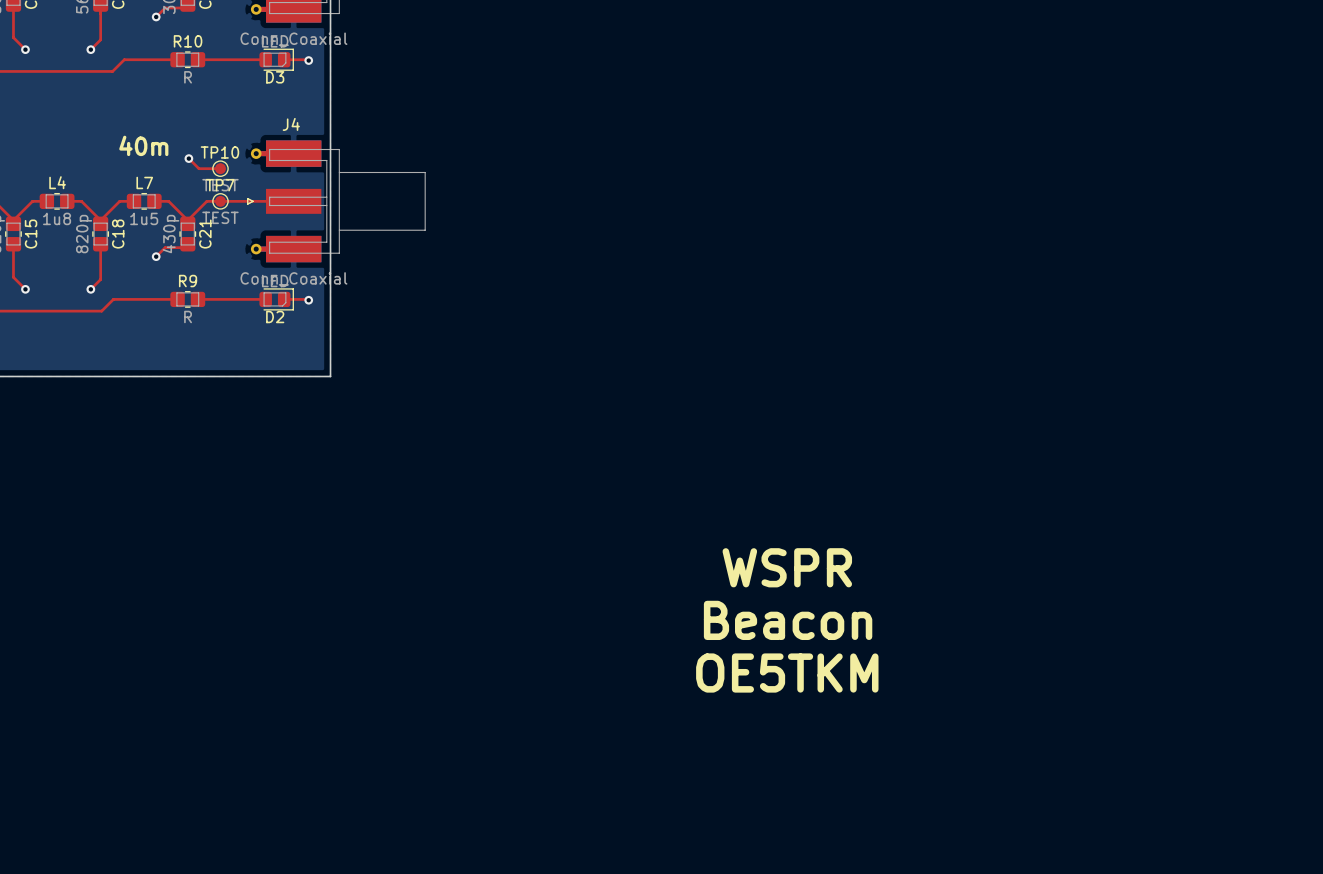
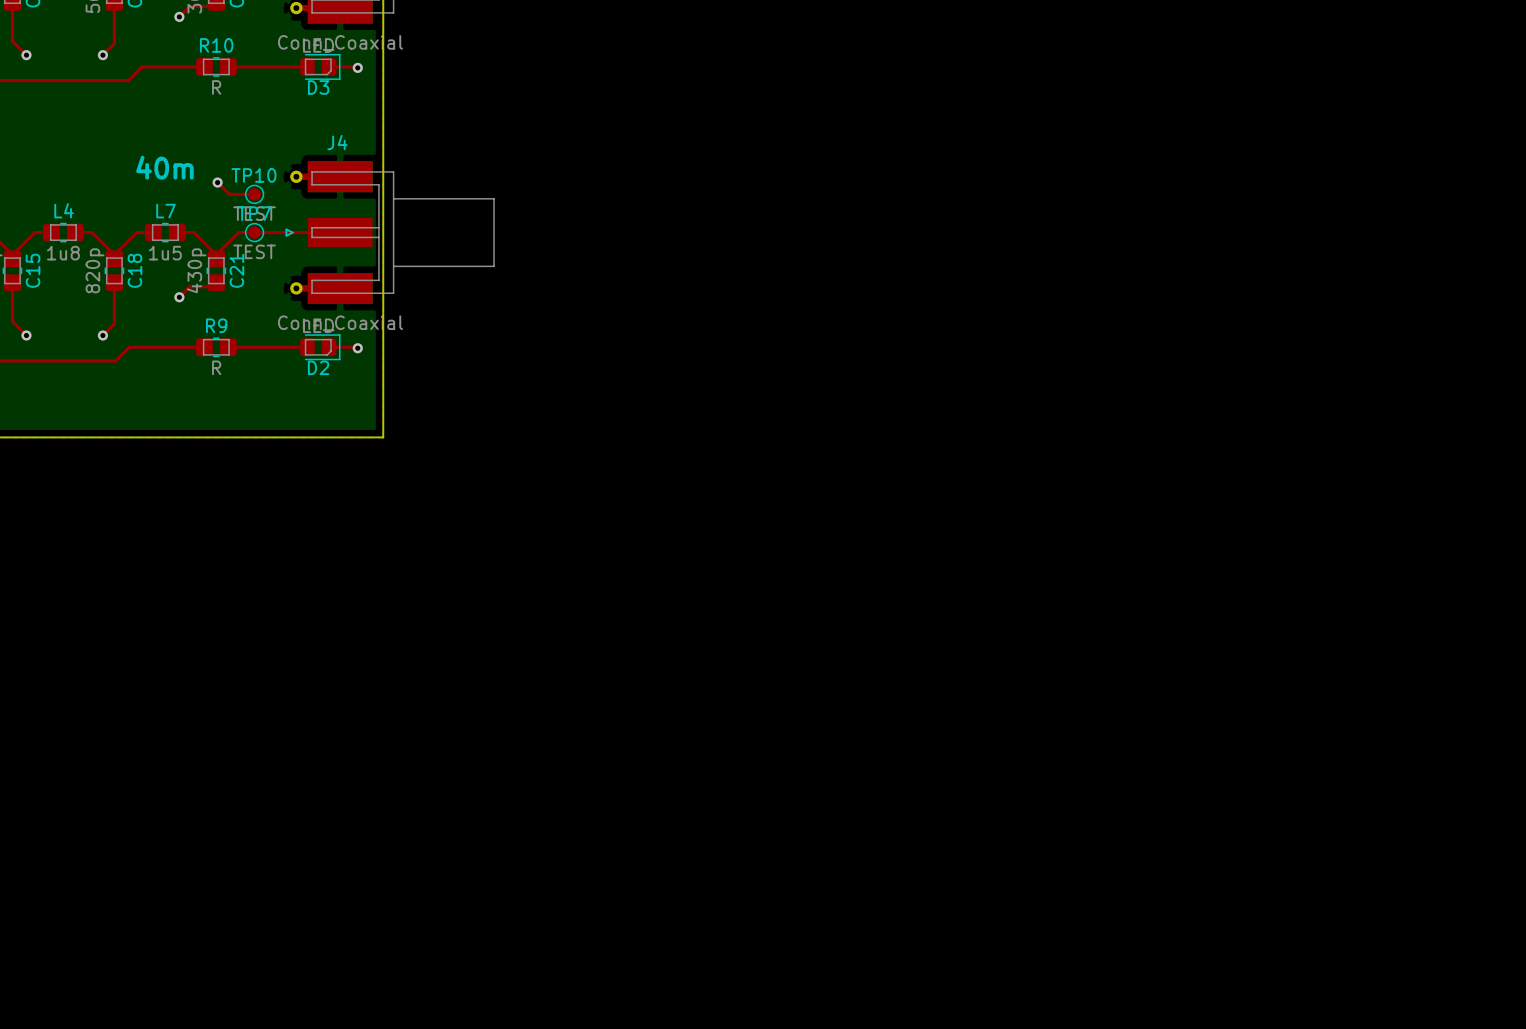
text: WSPR (787, 567) -> none
text: Beacon (788, 620) -> none
text: OE5TKM (787, 673) -> none

